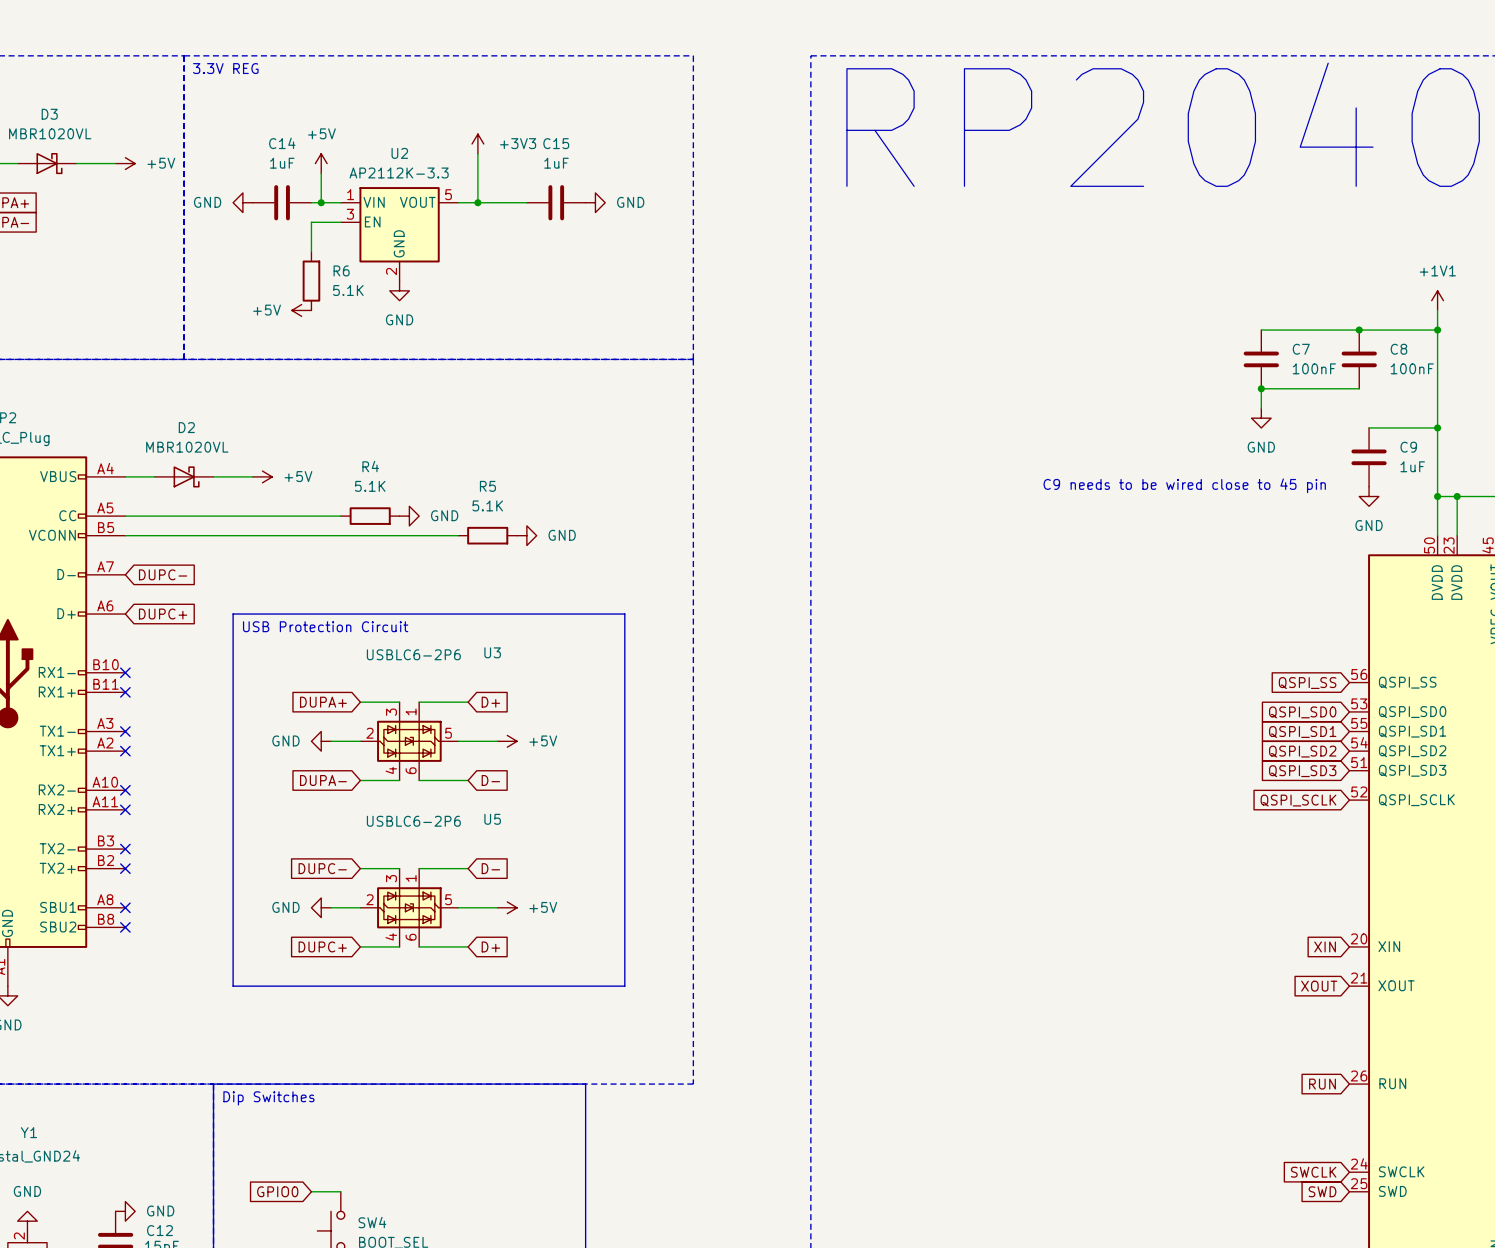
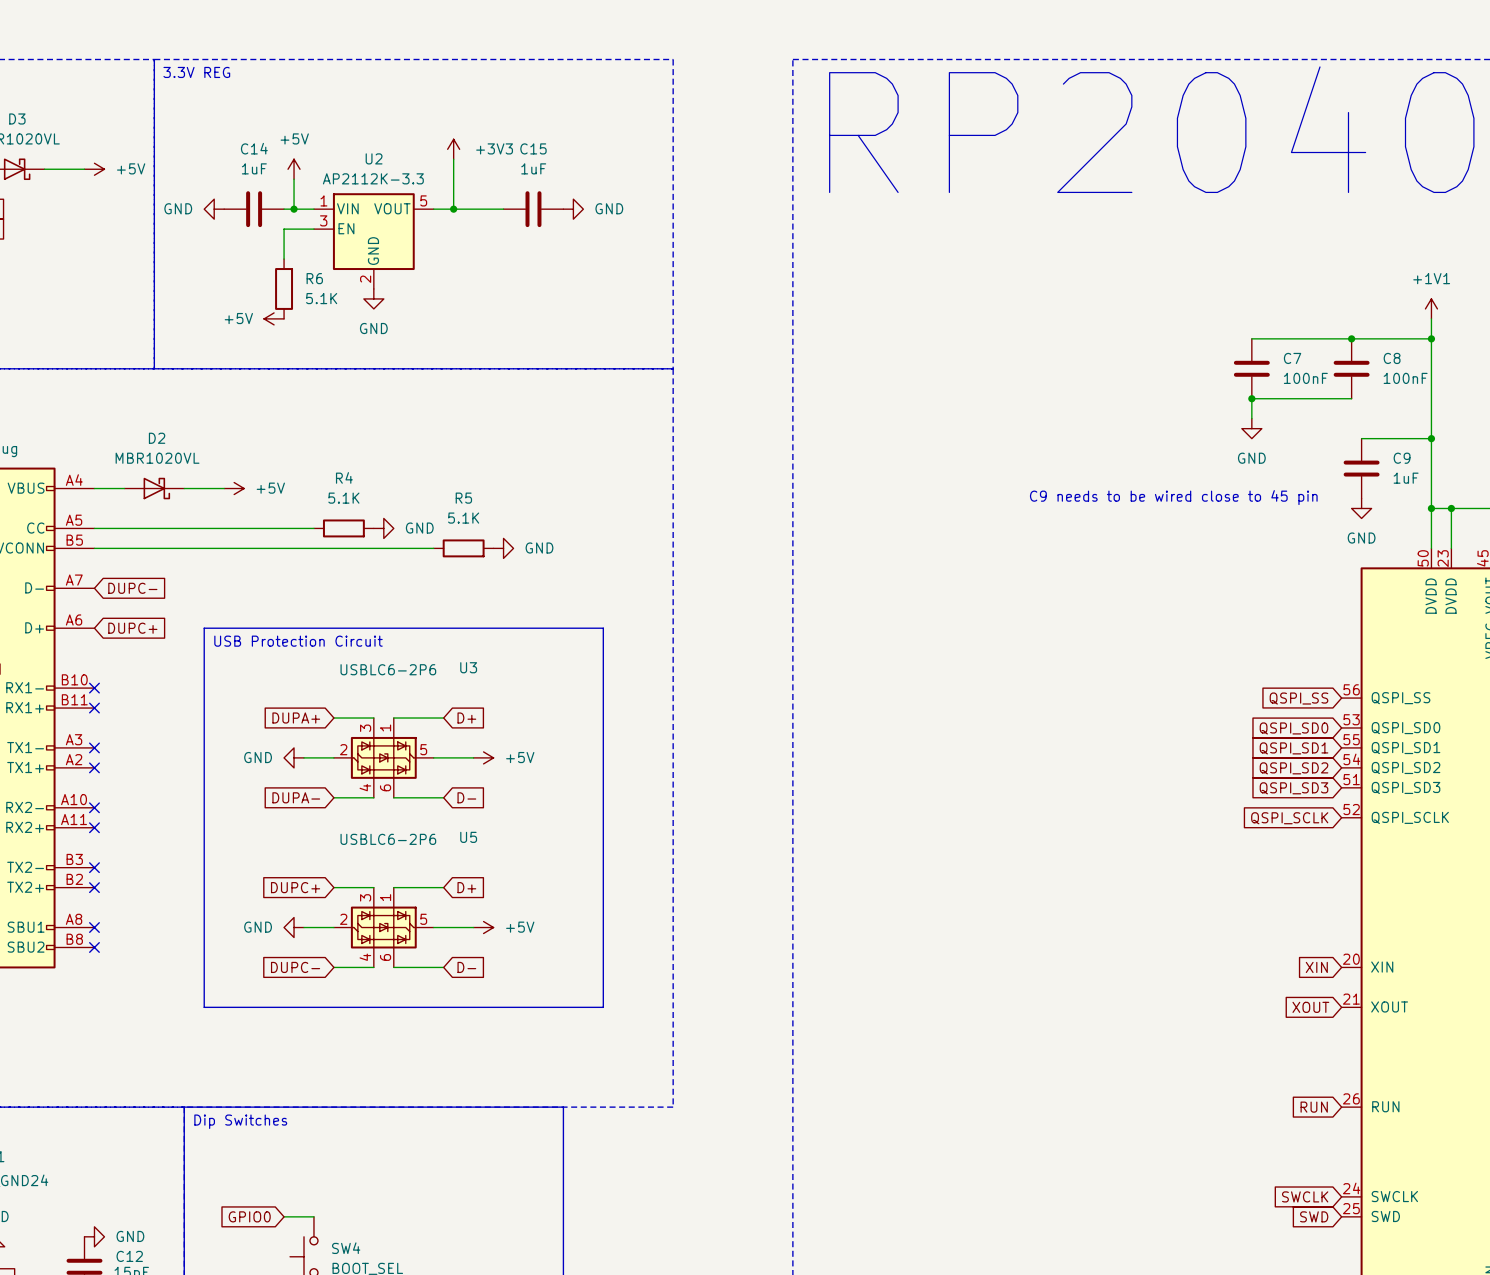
global label: DUPC- (322, 868) -> DUPC+ (295, 887)
global label: D- (490, 868) -> D+ (466, 887)
global label: DUPC+ (322, 946) -> DUPC- (295, 967)
global label: D+ (490, 946) -> D- (466, 967)

